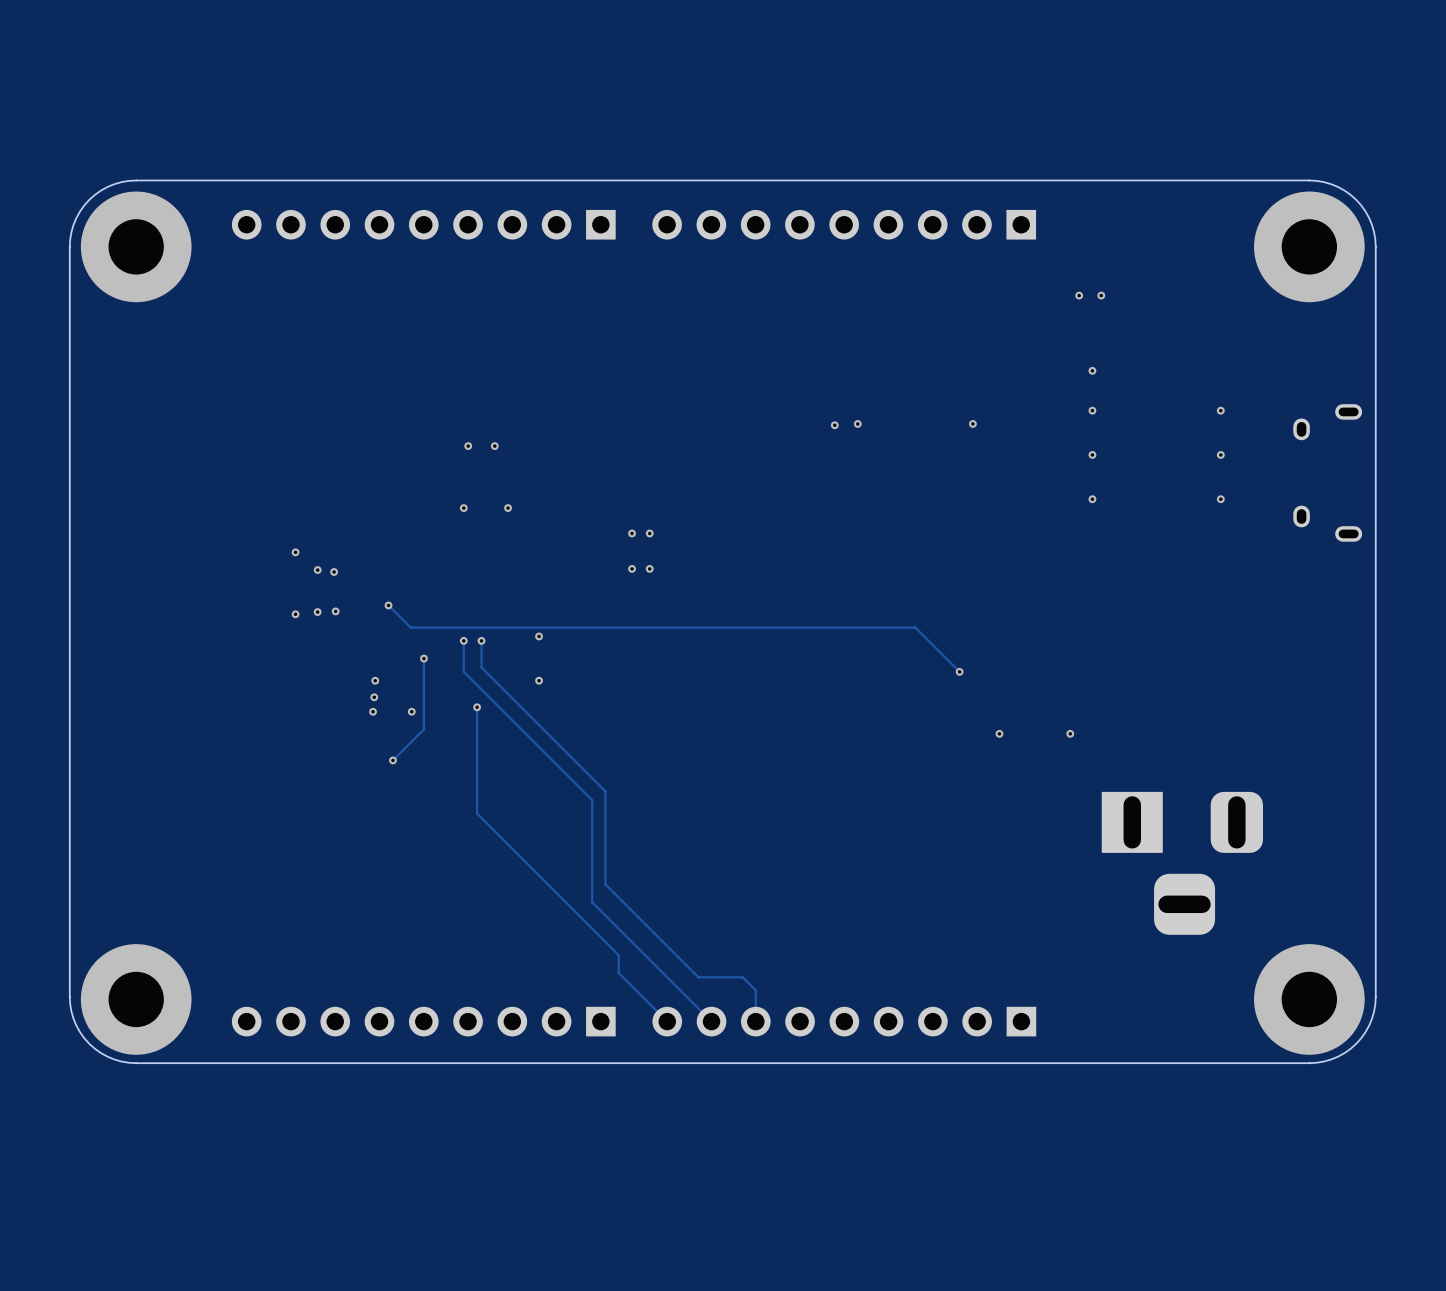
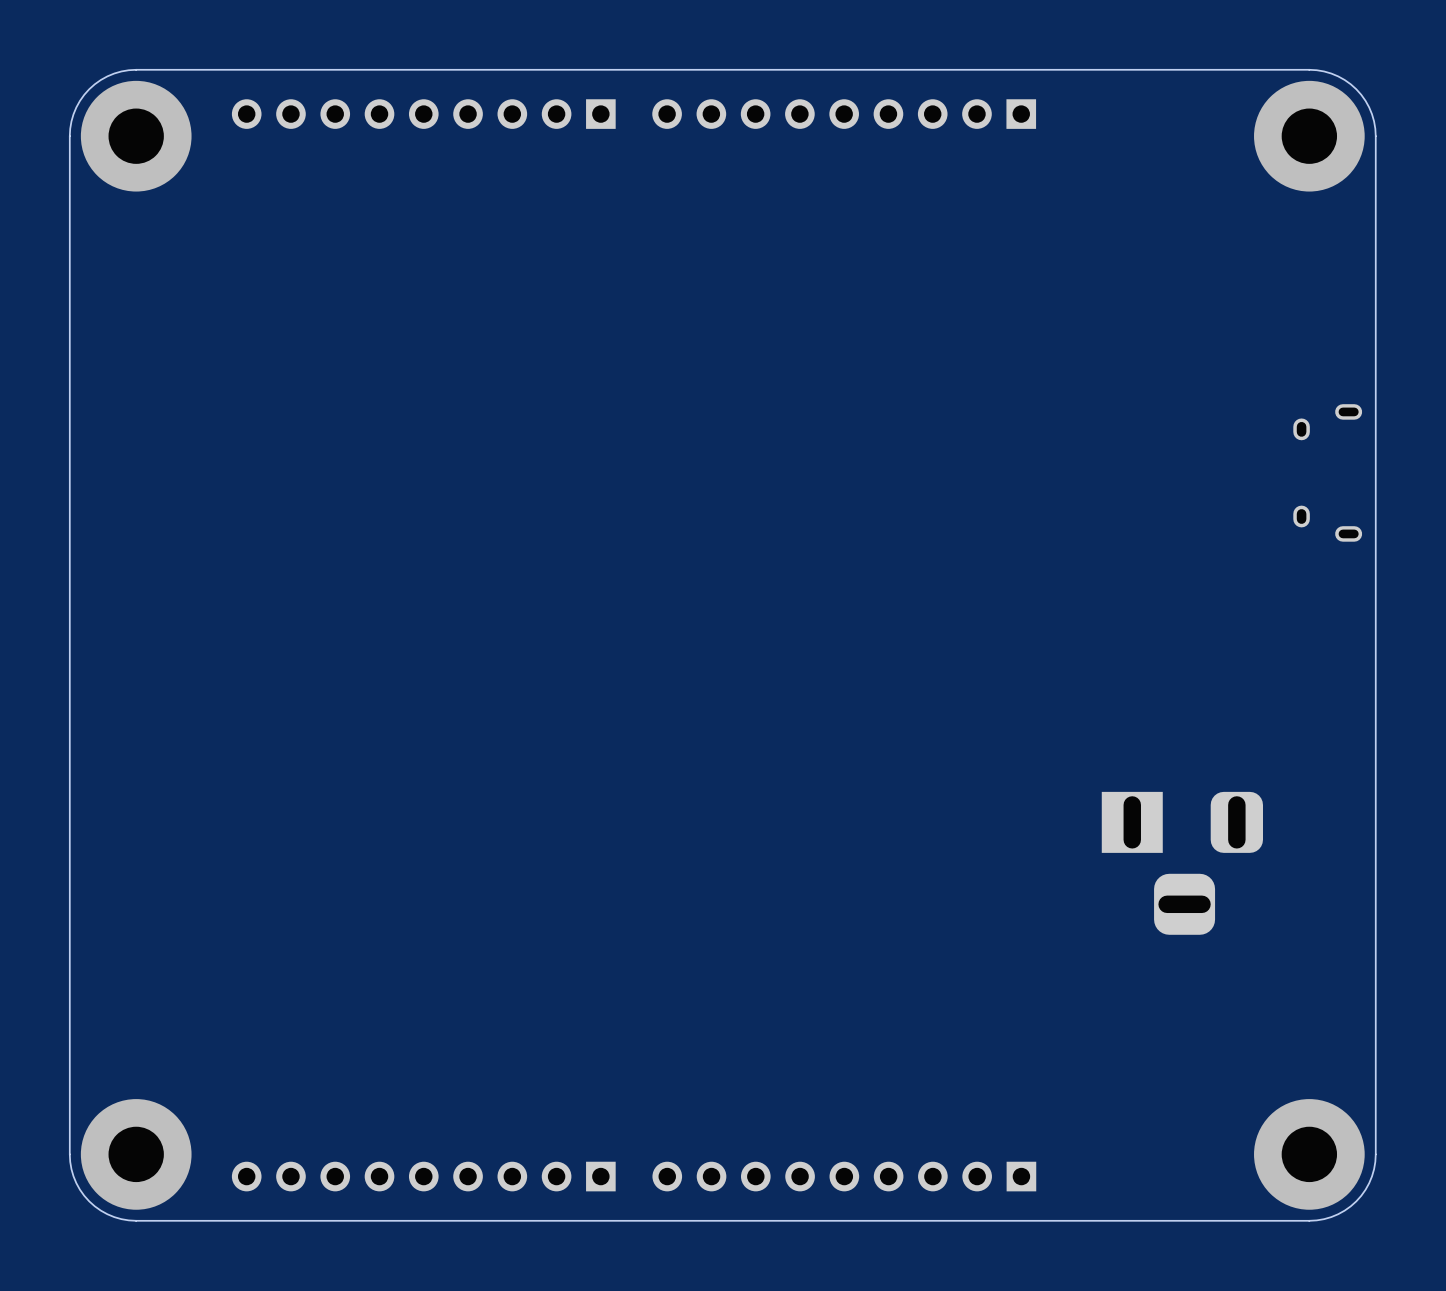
via: none -> (136, 136)
via: none -> (1309, 136)
part position: (423, 224) -> (423, 114)
part position: (844, 224) -> (844, 114)
via: (136, 246) -> none
via: (1309, 246) -> none
board edge: (1375, 246) (1374, 232) (1369, 218) (1356, 199) (1344, 190) (1331, 184) (1309, 180) (136, 180) (114, 184) (100, 190) (89, 199) (79, 211) (73, 224) (69, 246) -> (1375, 246) (1375, 136) (1372, 114) (1361, 94) (1350, 84) (1331, 73) (1309, 69) (128, 70) (114, 73) (94, 84) (79, 100) (73, 114) (69, 136) (69, 246)
via: (1079, 295) -> none
via: (1101, 295) -> none
via: (1092, 370) -> none
via: (1092, 410) -> none
via: (1220, 410) -> none
via: (857, 423) -> none
via: (972, 423) -> none
via: (834, 425) -> none
via: (468, 446) -> none
via: (494, 446) -> none
via: (1092, 454) -> none
via: (1220, 454) -> none
via: (1092, 499) -> none
via: (1220, 499) -> none
via: (463, 508) -> none
via: (508, 508) -> none
via: (632, 533) -> none
via: (649, 533) -> none
via: (295, 552) -> none
via: (632, 568) -> none
via: (649, 568) -> none
via: (317, 570) -> none
via: (334, 571) -> none
track: (388, 605) (410, 627) (915, 627) (959, 671) -> none
via: (388, 605) -> none
via: (335, 611) -> none
via: (317, 612) -> none
via: (295, 614) -> none
via: (539, 636) -> none
track: (463, 640) (463, 671) (592, 800) (592, 902) (711, 1021) -> none
via: (463, 640) -> none
track: (481, 640) (481, 667) (605, 791) (605, 884) (698, 977) (742, 977) (755, 990) (755, 1021) -> none
via: (481, 640) -> none
track: (423, 658) (423, 729) (392, 760) -> none
via: (423, 658) -> none
via: (959, 671) -> none
via: (375, 680) -> none
via: (539, 680) -> none
via: (374, 697) -> none
track: (477, 707) (477, 813) (618, 955) (618, 973) (667, 1021) -> none
via: (477, 707) -> none
via: (373, 711) -> none
via: (411, 711) -> none
via: (999, 733) -> none
via: (1070, 733) -> none
via: (392, 760) -> none
board edge: (1375, 996) (1372, 1018) (1365, 1032) (1356, 1043) (1344, 1053) (1331, 1059) (1309, 1063) (136, 1063) (121, 1061) (107, 1056) (89, 1043) (76, 1025) (71, 1011) (69, 996) -> (1375, 996) (1375, 1154) (1372, 1176) (1365, 1189) (1350, 1206) (1331, 1217) (1309, 1220) (136, 1220) (121, 1219) (107, 1214) (89, 1201) (76, 1183) (71, 1169) (69, 1154) (69, 996)
via: (136, 999) -> none
via: (1309, 999) -> none
part position: (423, 1021) -> (423, 1176)
part position: (844, 1021) -> (844, 1176)
via: none -> (136, 1154)
via: none -> (1309, 1154)

